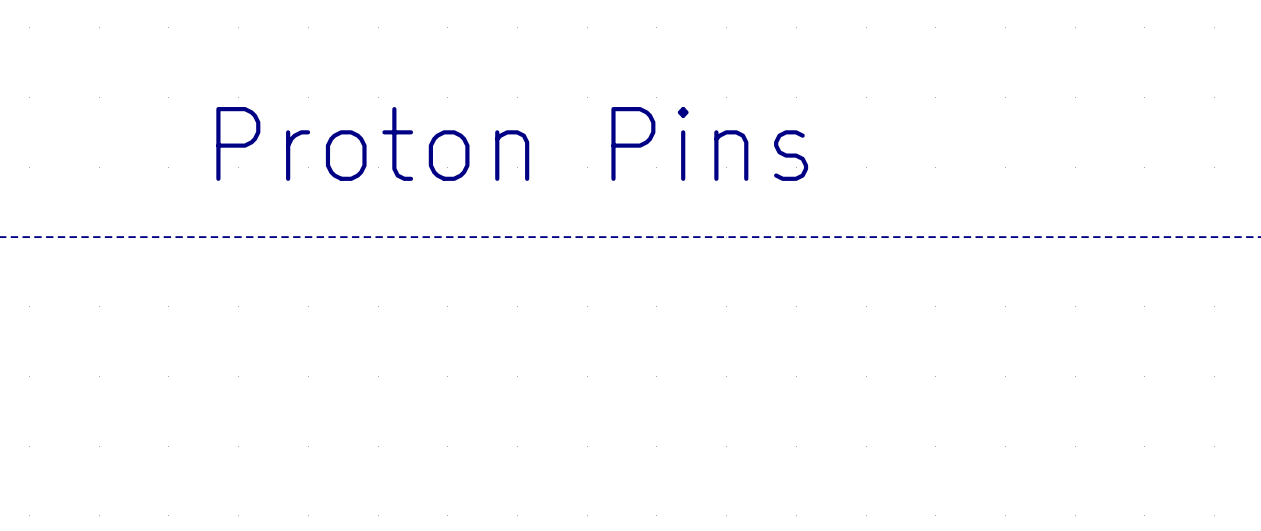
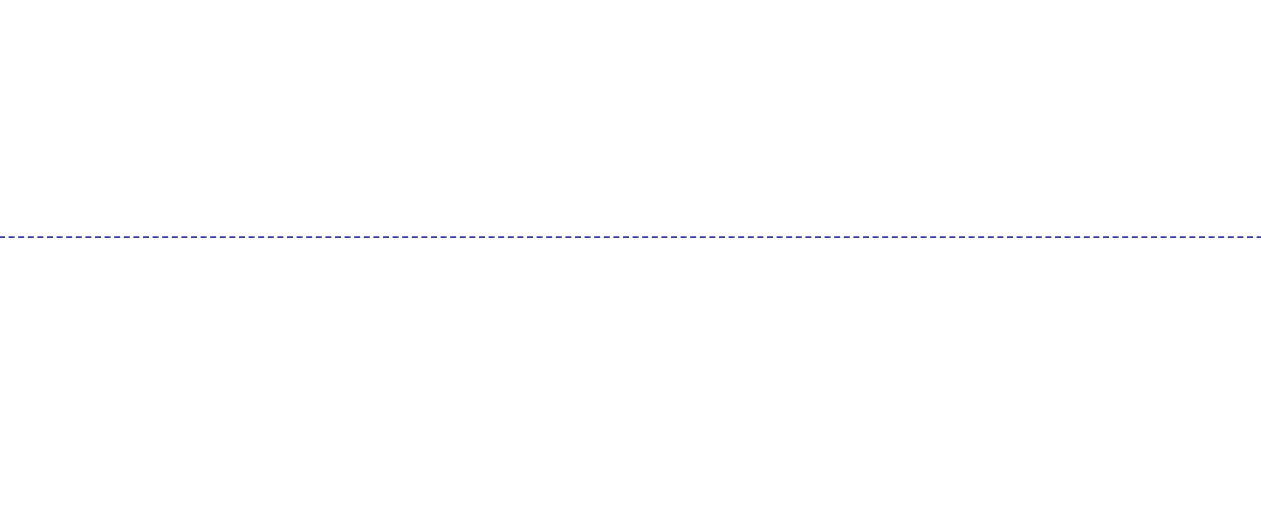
text: Proton Pins (512, 143) -> none

